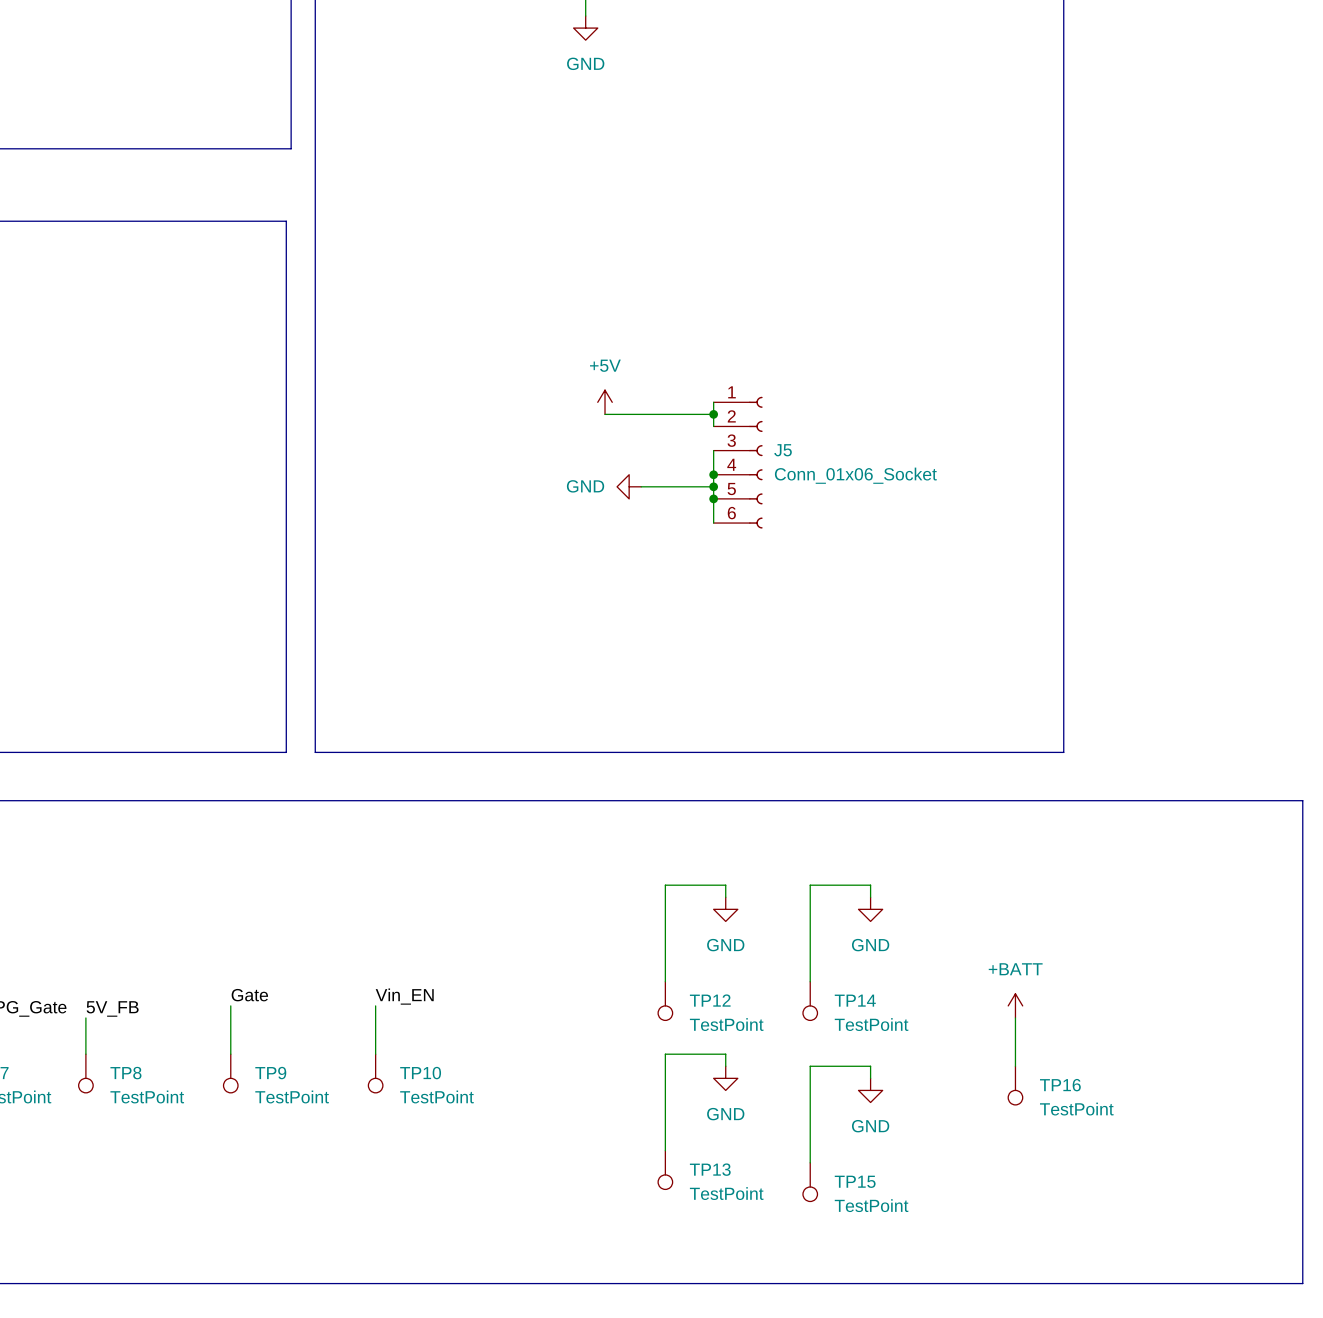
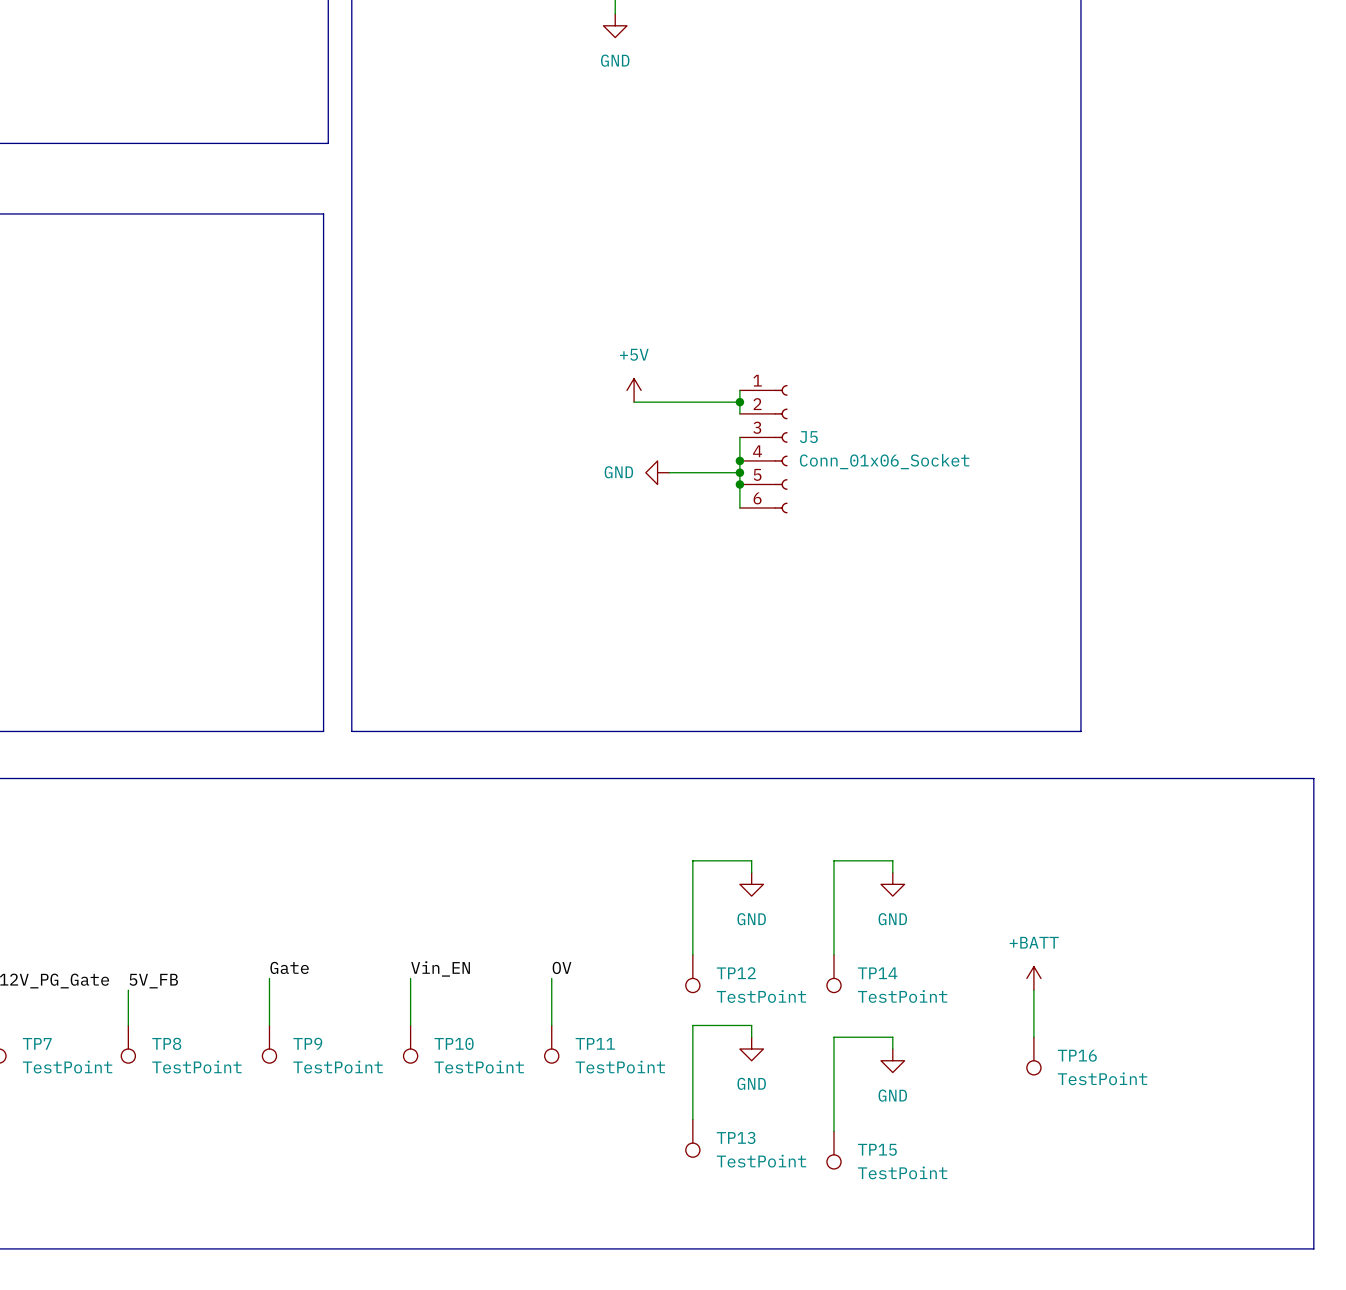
label: none -> OV (562, 967)
wire: none -> (551, 978) (551, 1025)
TP11: none -> TestPoint (551, 1044)

